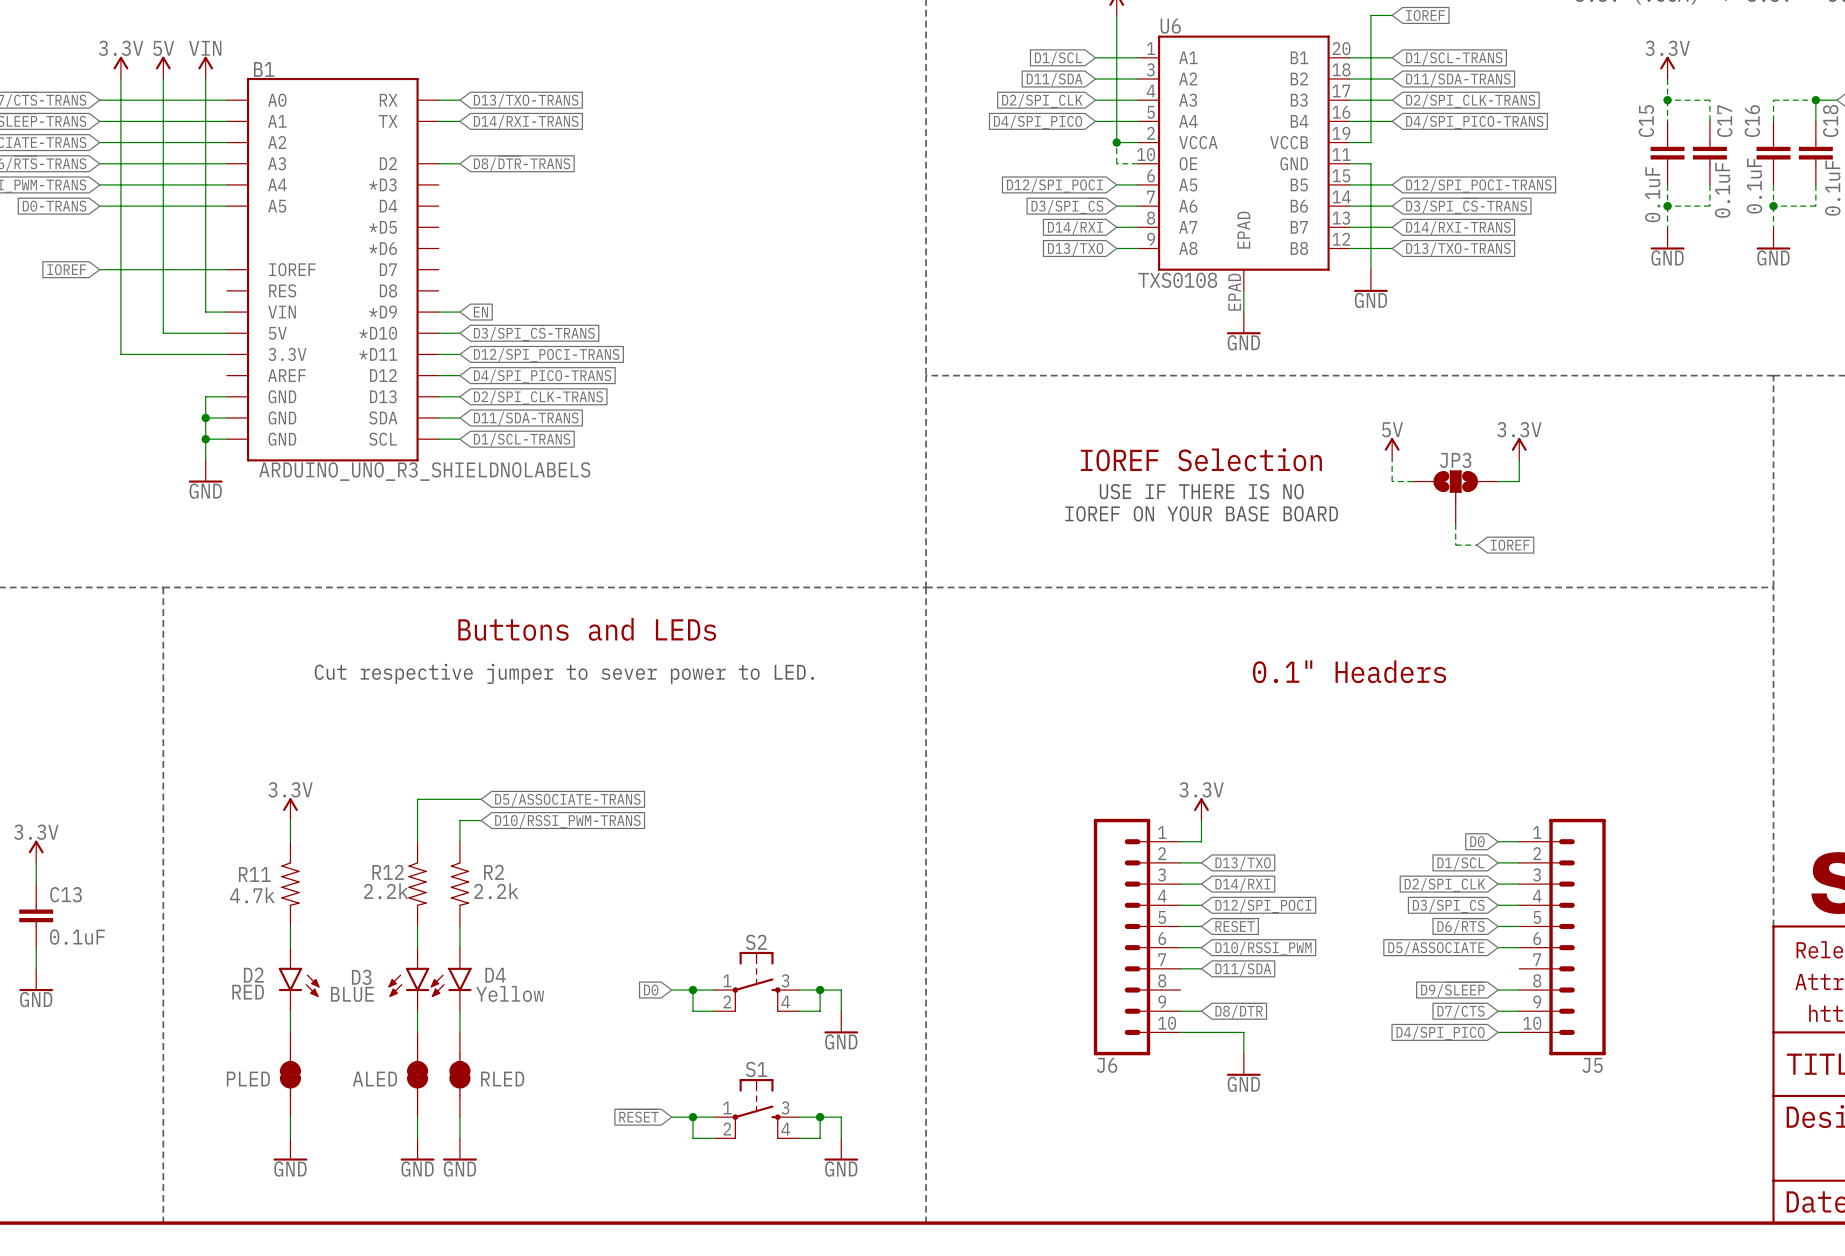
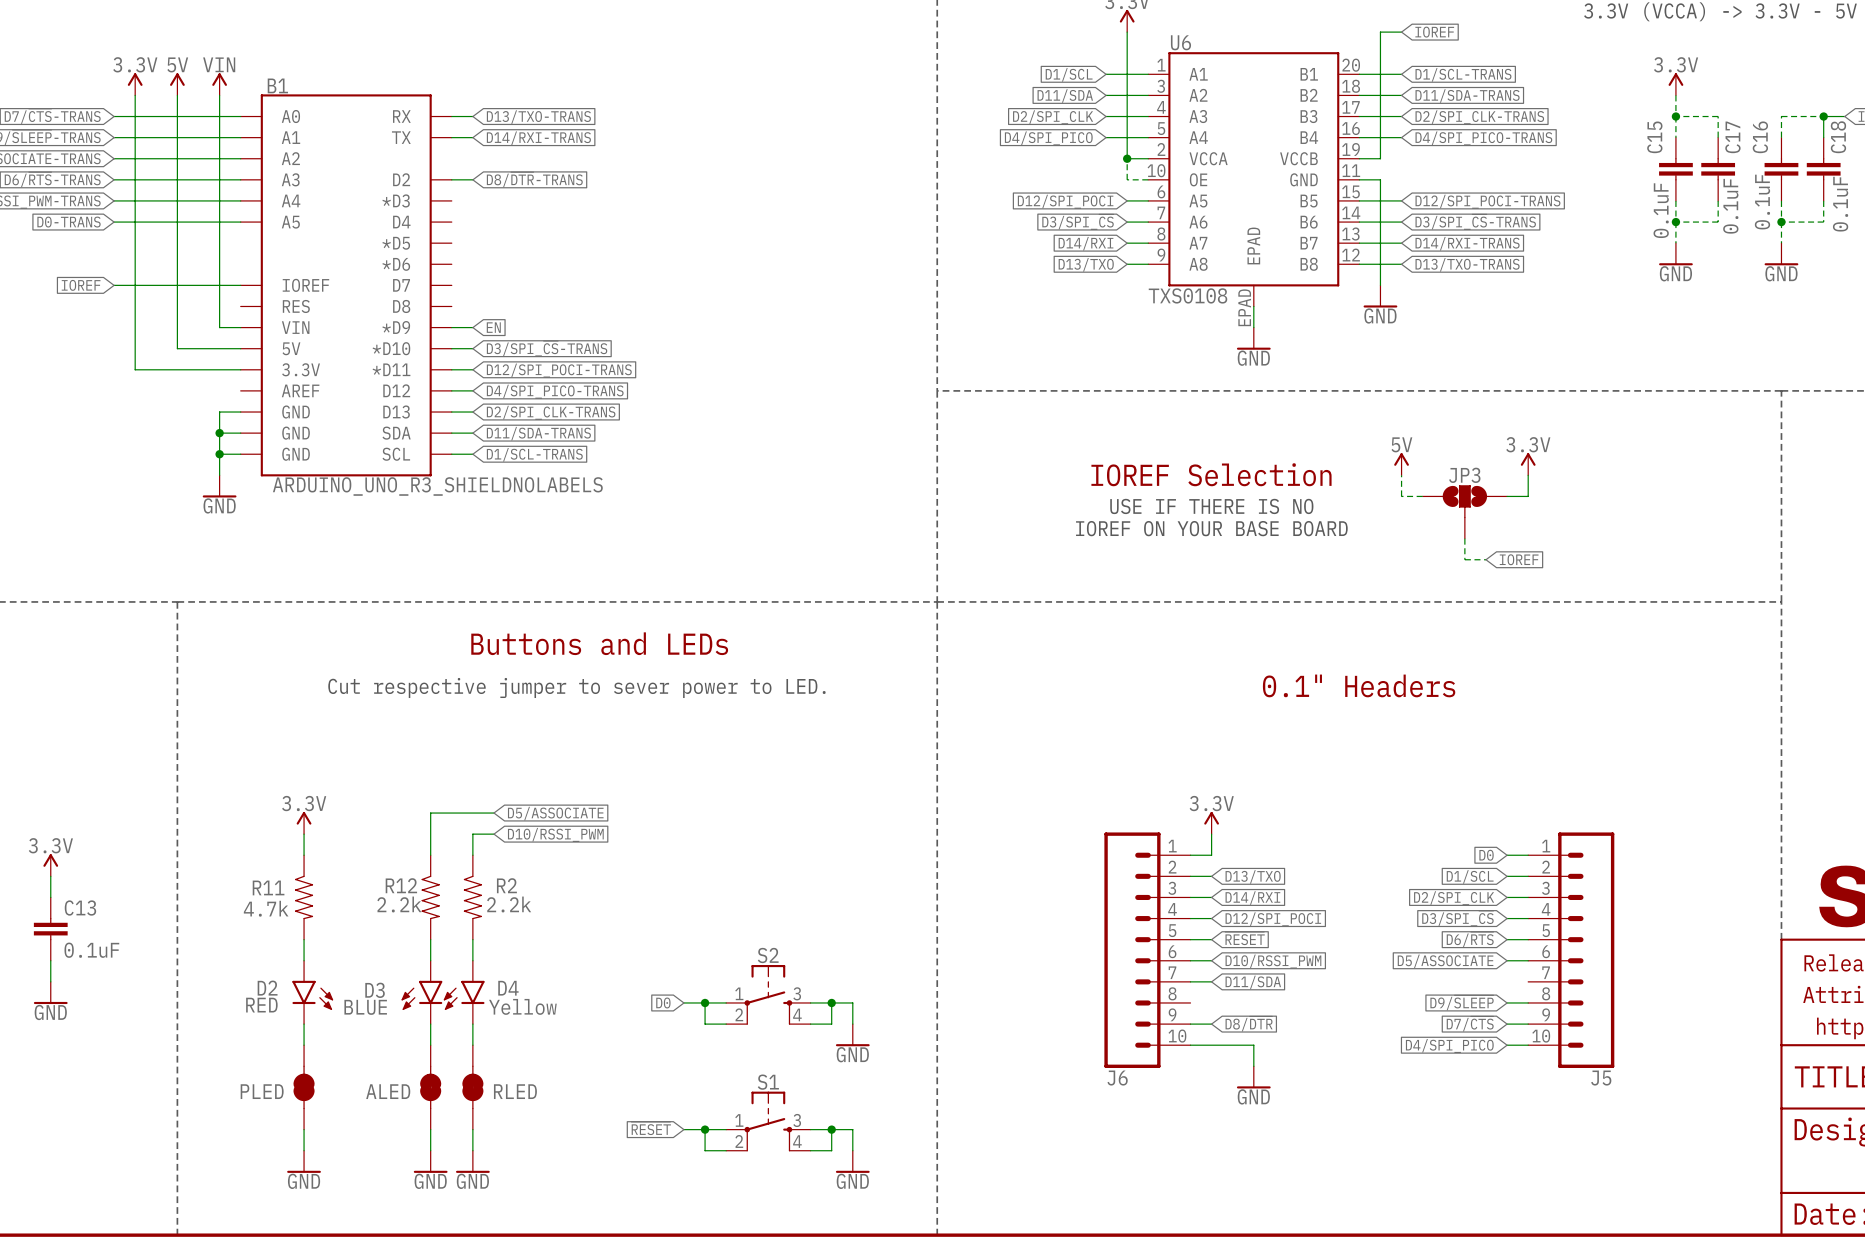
global label: D5/ASSOCIATE-TRANS (567, 799) -> D5/ASSOCIATE (555, 813)
global label: D10/RSSI_PWM-TRANS (567, 821) -> D10/RSSI_PWM (555, 834)

